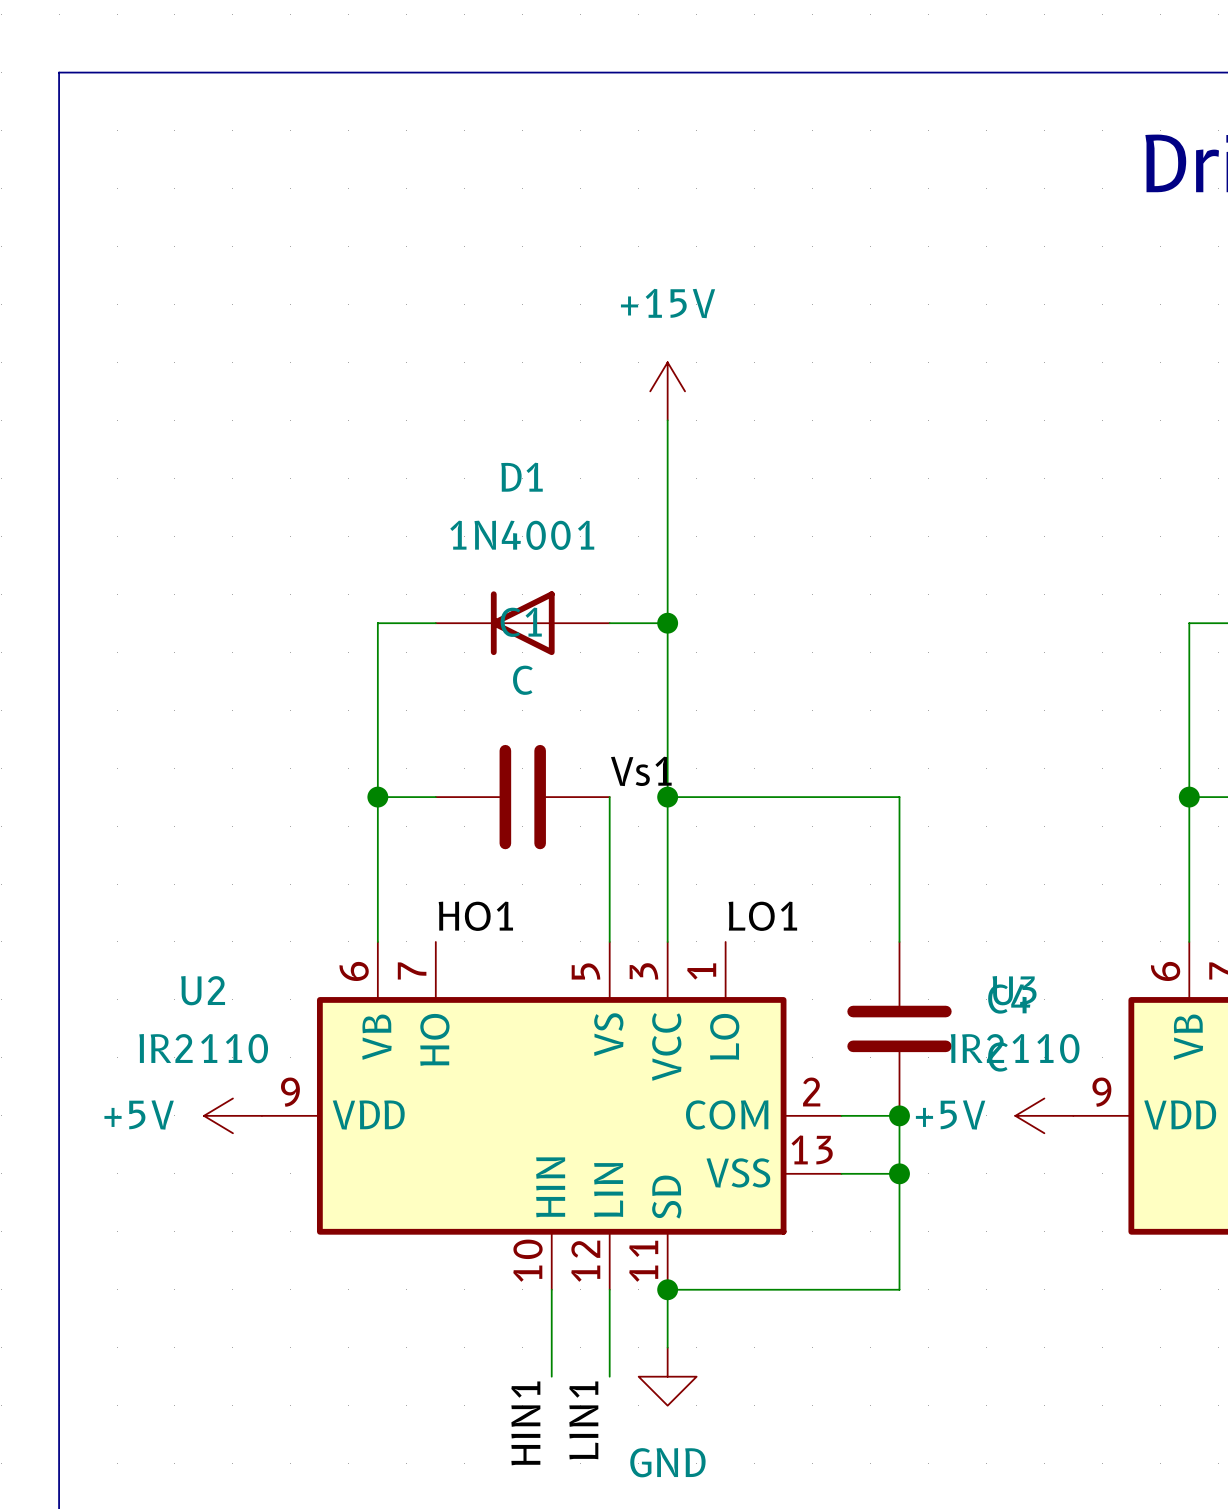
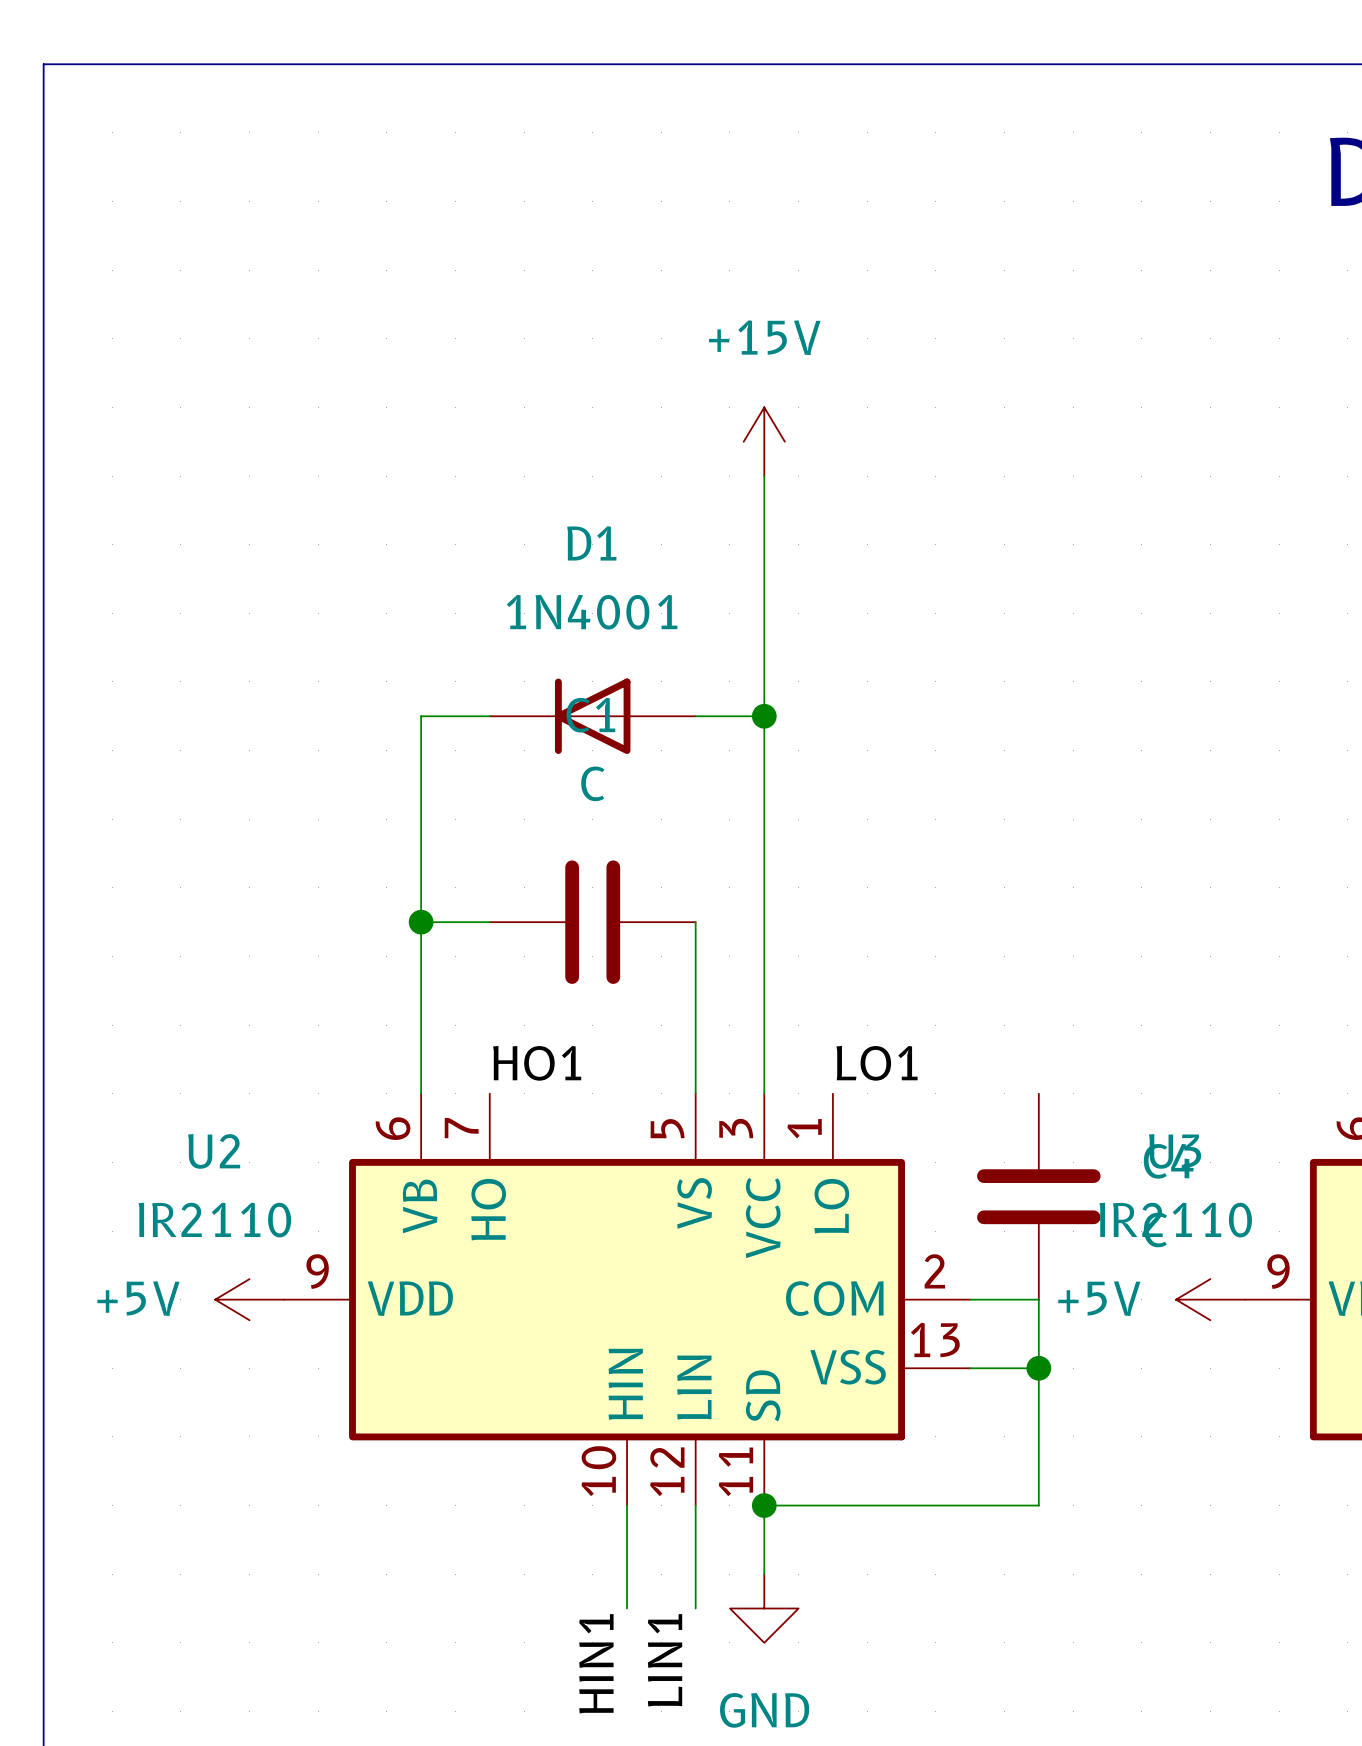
label: Vs1 (641, 771) -> none
wire: (667, 797) (899, 797) (899, 941) -> none
junction: (667, 797) -> none
junction: (899, 1115) -> none

